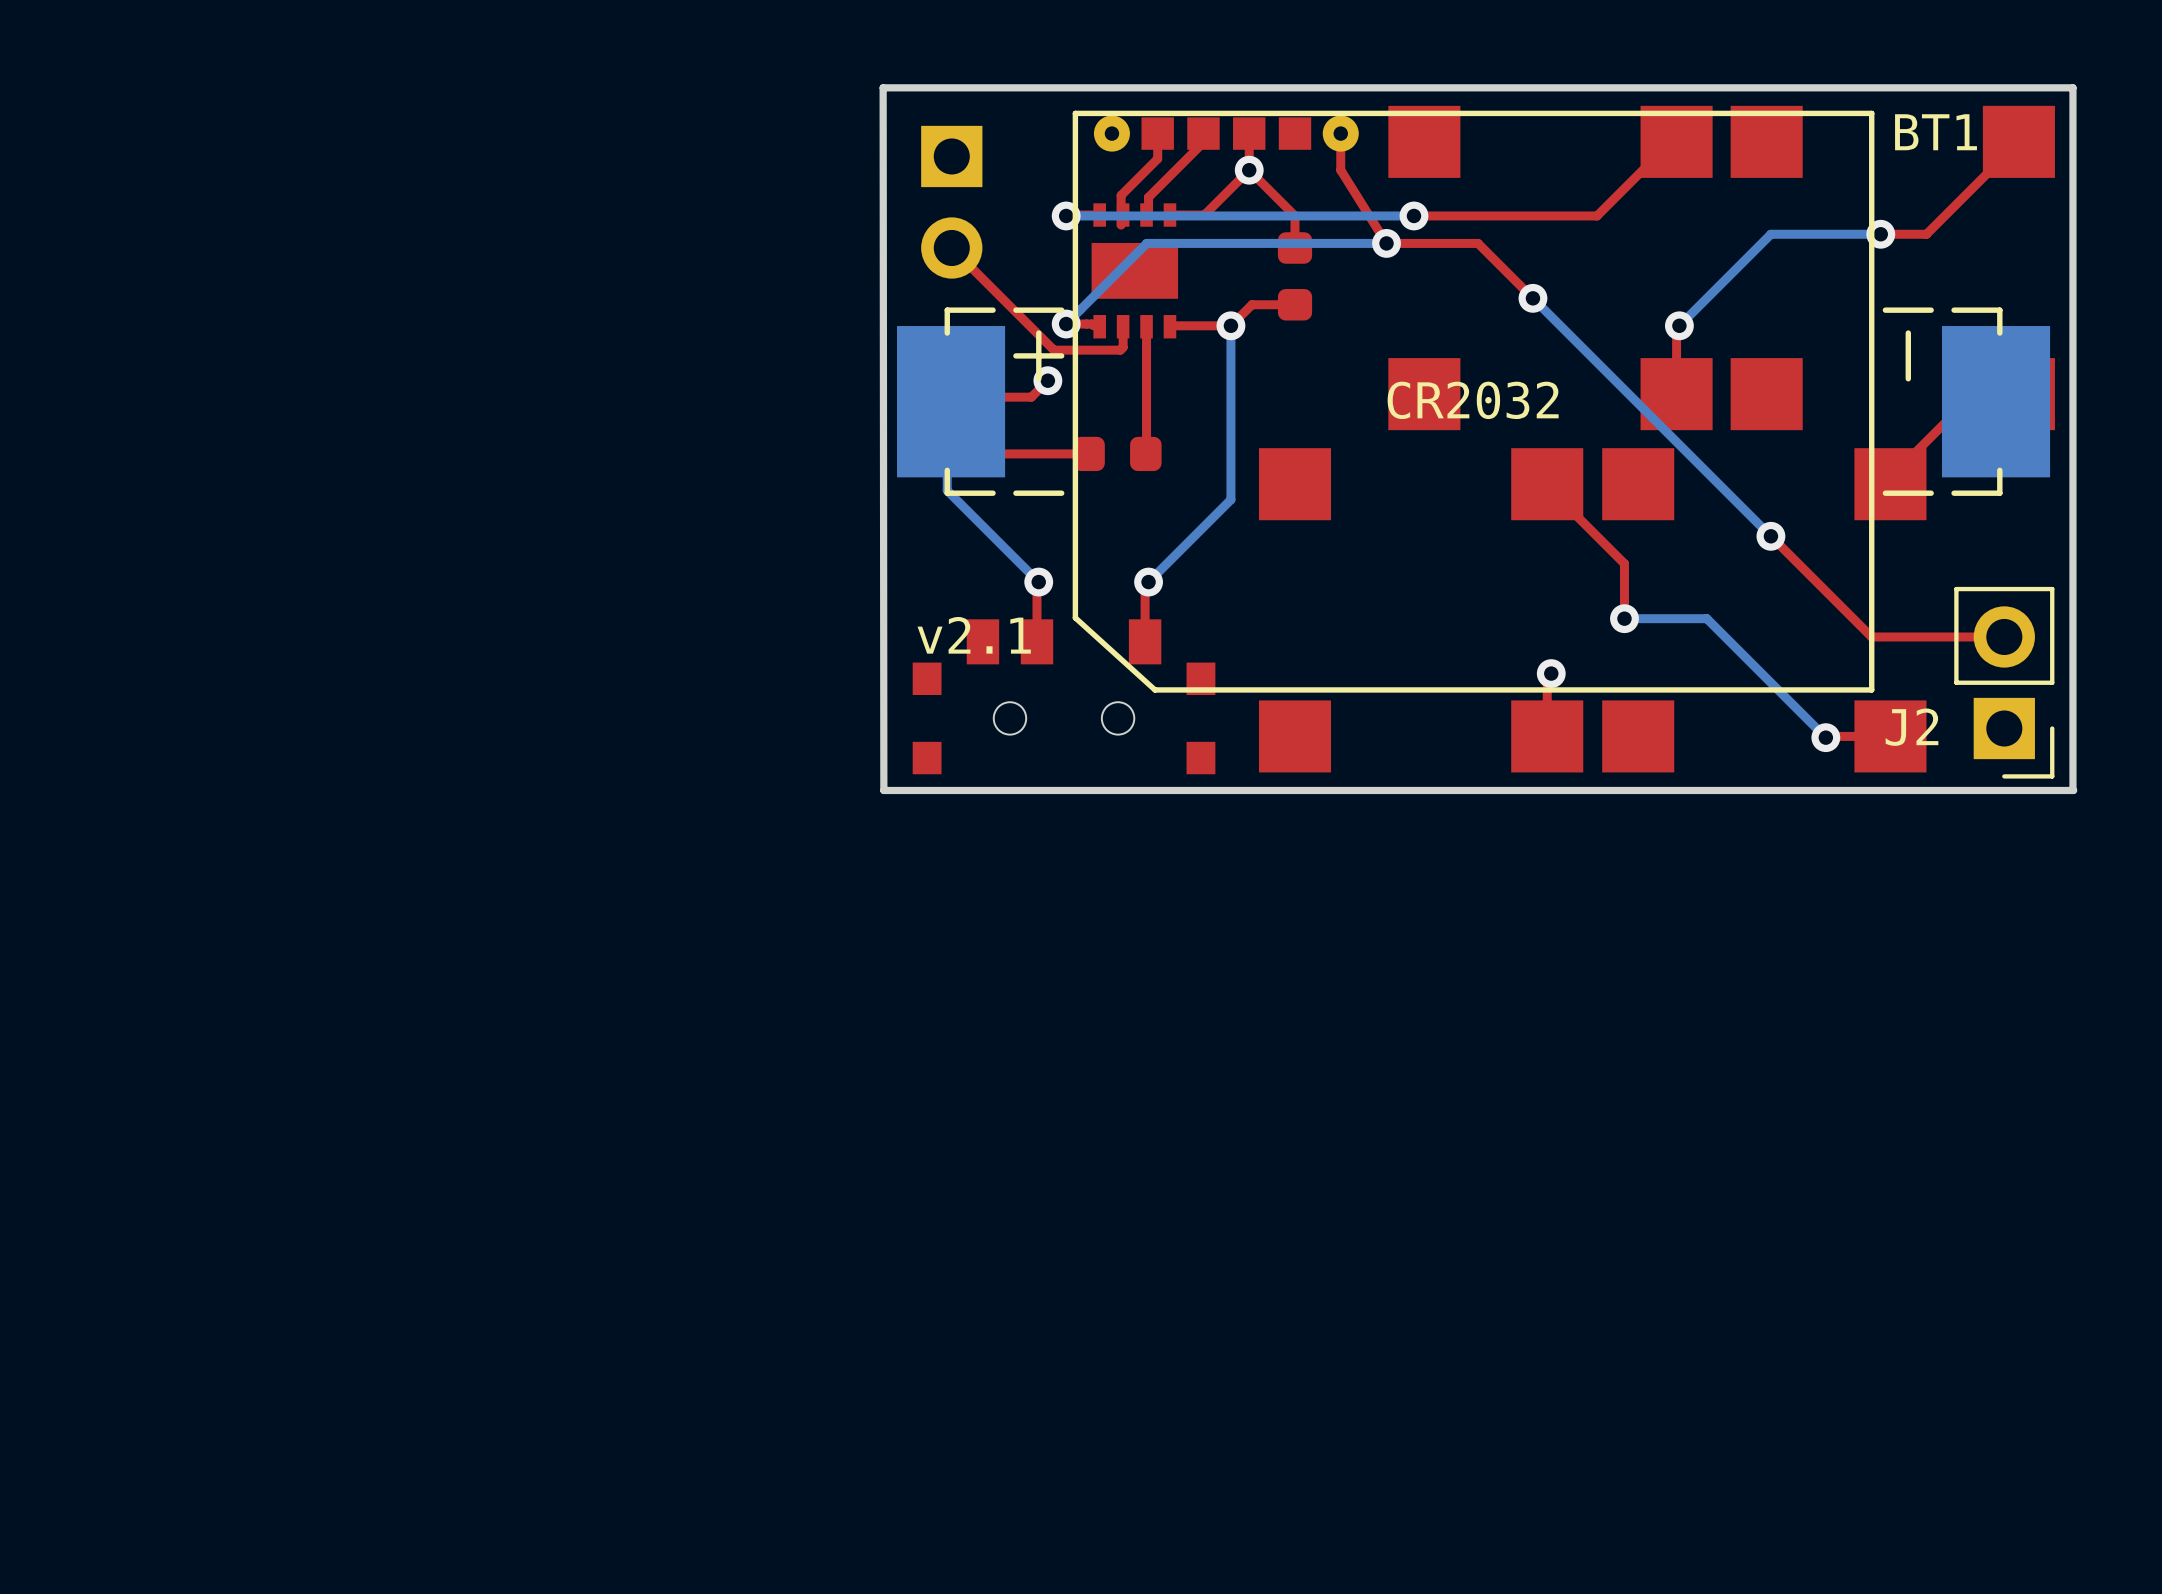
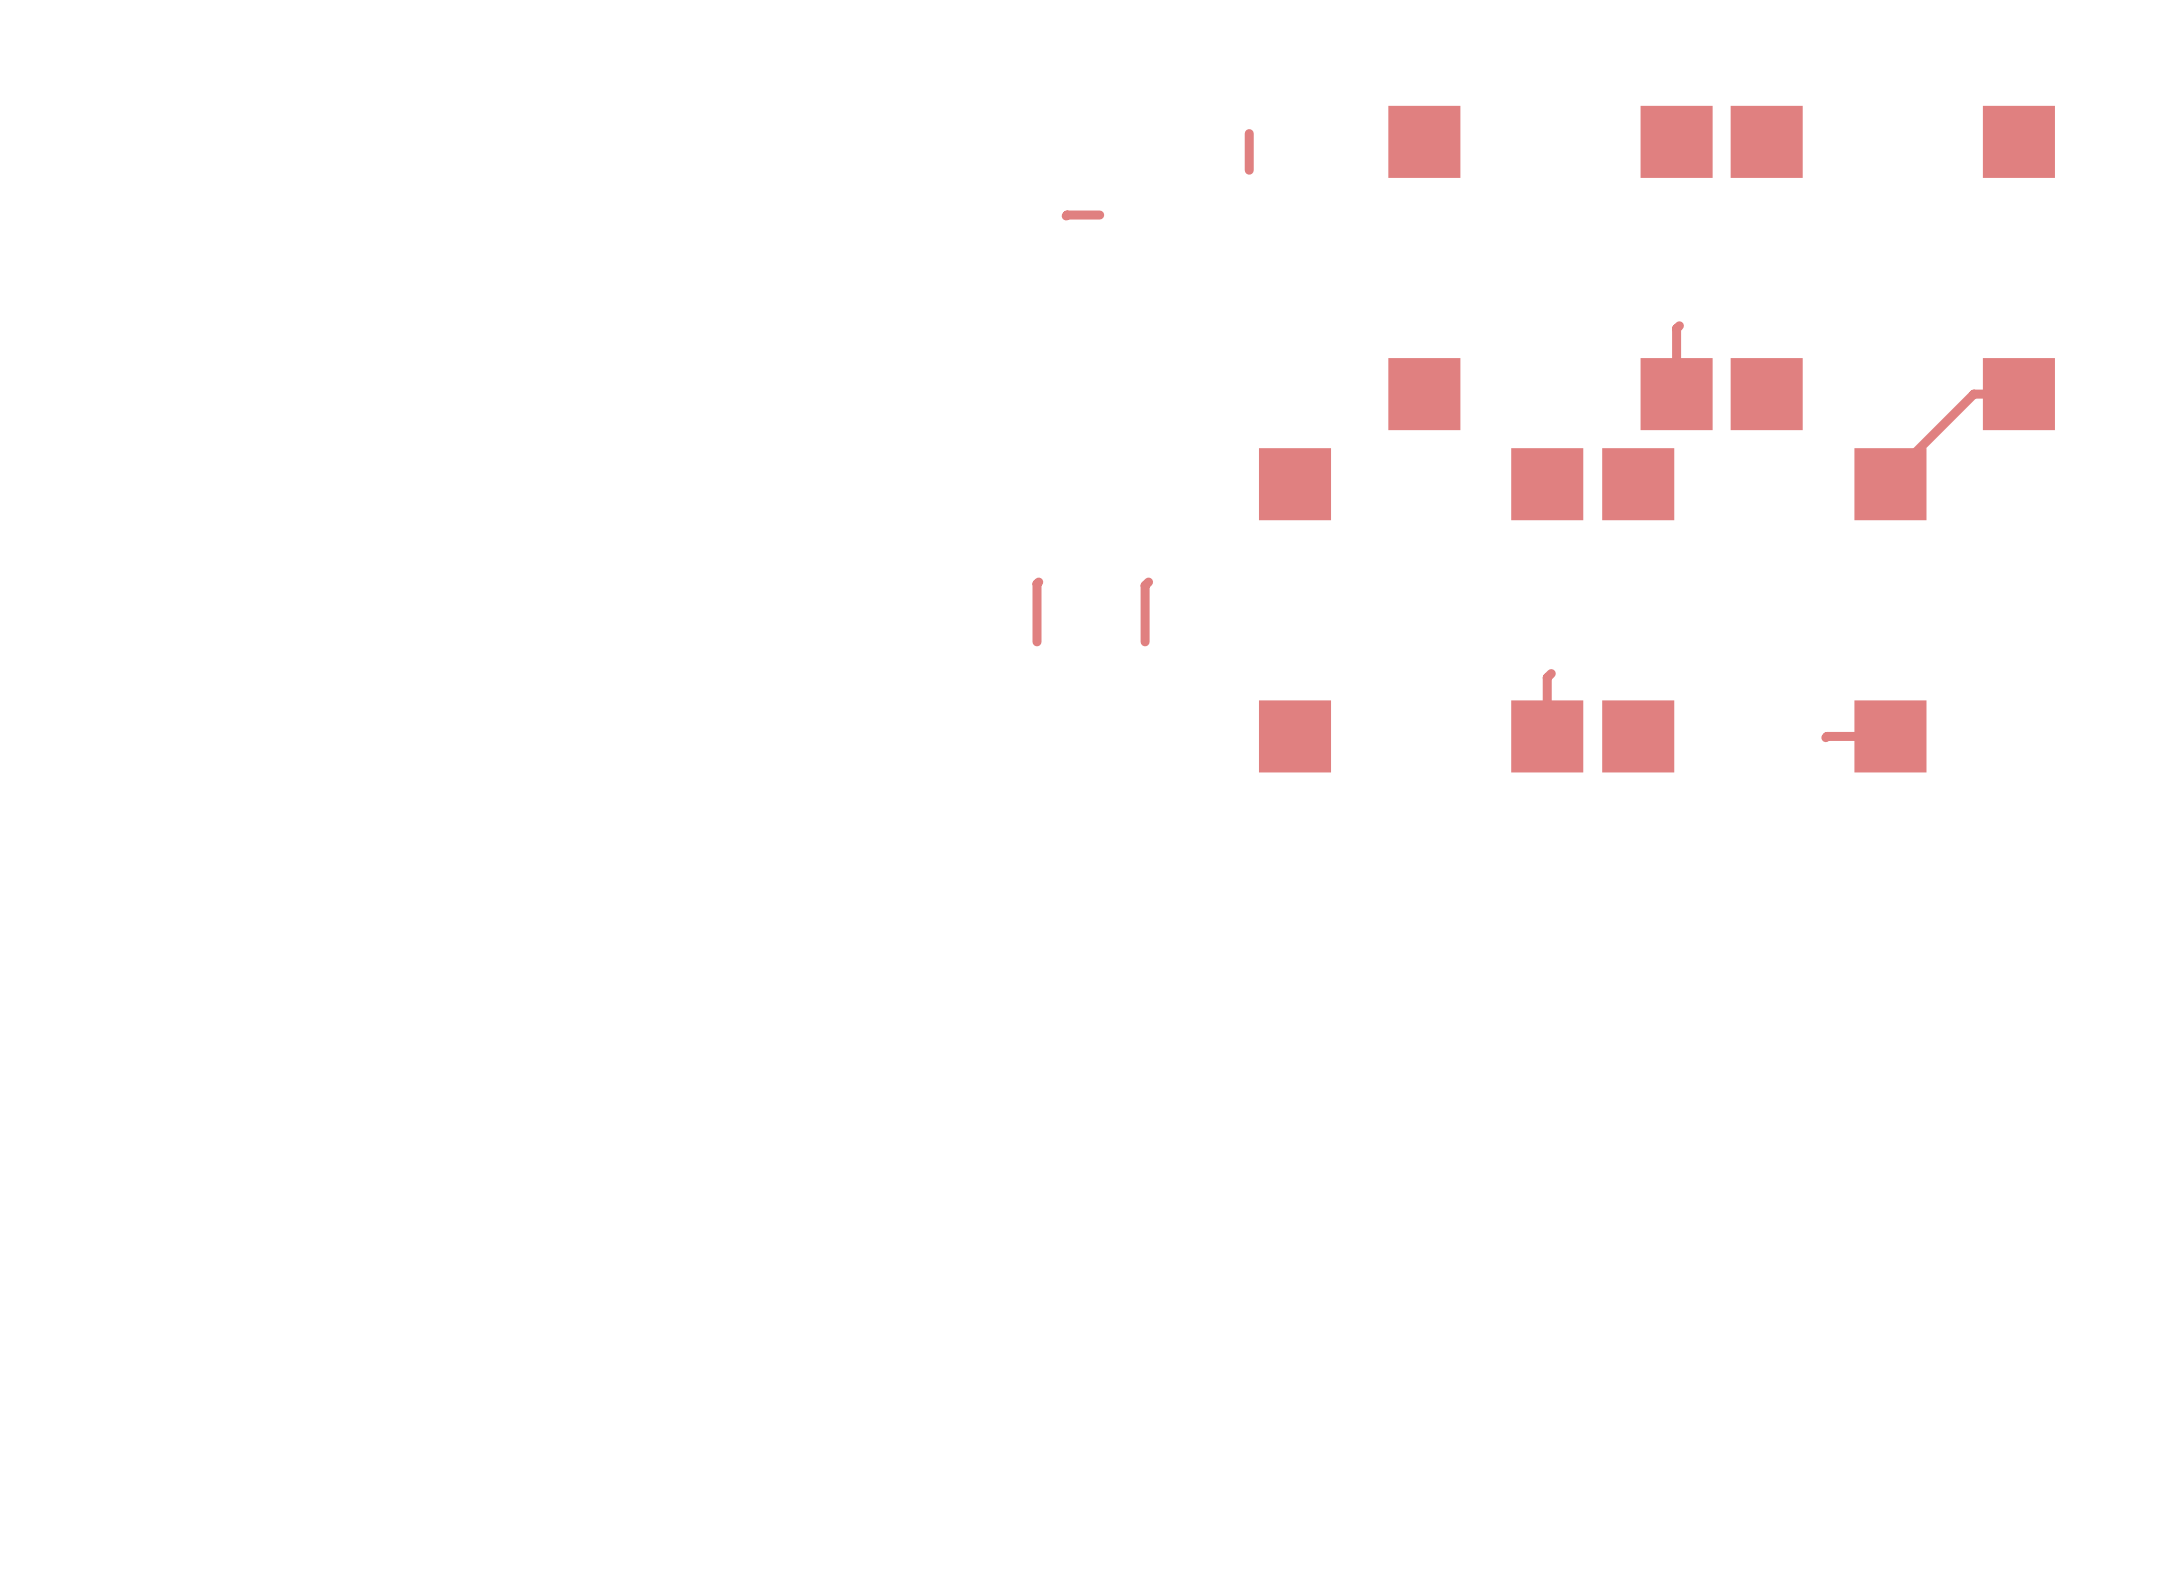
top track: (1157, 133) (1157, 158) (1121, 195) (1121, 225) -> none
top track: (1203, 133) (1203, 142) (1148, 197) (1148, 215) -> none
part: (1226, 133) -> none
top track: (1340, 133) (1340, 170) (1386, 243) (1478, 243) (1532, 298) -> none
top track: (1670, 142) (1597, 215) (1413, 215) -> none
top track: (2018, 142) (1926, 234) (1880, 234) -> none
via: (1249, 170) -> none
part: (951, 202) -> none
via: (1066, 215) -> none
top track: (1169, 215) (1204, 215) (1249, 170) (1295, 215) (1295, 248) -> none
bottom track: (1413, 215) (1066, 215) -> none
via: (1413, 215) -> none
bottom track: (1880, 234) (1770, 234) (1679, 325) -> none
via: (1880, 234) -> none
top track: (947, 243) (1053, 350) (1120, 350) (1123, 347) (1123, 326) -> none
bottom track: (1386, 243) (1146, 243) (1066, 324) -> none
via: (1386, 243) -> none
part: (1134, 270) -> none
part: (1295, 276) -> none
bottom track: (1532, 298) (1770, 536) -> none
via: (1532, 298) -> none
top track: (1295, 304) (1251, 304) (1230, 325) (1176, 325) -> none
top track: (1066, 324) (1091, 324) (1093, 325) -> none
via: (1066, 324) -> none
bottom track: (1230, 325) (1230, 499) (1148, 582) -> none
via: (1230, 325) -> none
via: (1679, 325) -> none
top track: (1146, 326) (1146, 451) -> none
top track: (1047, 380) (1031, 397) (974, 397) -> none
via: (1047, 380) -> none
BT1: (1473, 401) -> none
bottom track: (947, 408) (947, 490) (1038, 582) -> none
top track: (1089, 453) (974, 453) -> none
part: (1117, 453) -> none
top track: (1551, 490) (1624, 563) (1624, 618) -> none
top track: (1770, 536) (1871, 636) (2004, 636) -> none
via: (1770, 536) -> none
via: (1038, 582) -> none
via: (1148, 582) -> none
bottom track: (1624, 618) (1706, 618) (1825, 737) -> none
via: (1624, 618) -> none
text: v2.1 (974, 635) -> none
via: (1551, 673) -> none
J2: (2004, 682) -> none
part: (1064, 696) -> none
via: (1825, 737) -> none
board edge: (2073, 790) (883, 790) (883, 87) (2072, 87) (2072, 790) -> none

